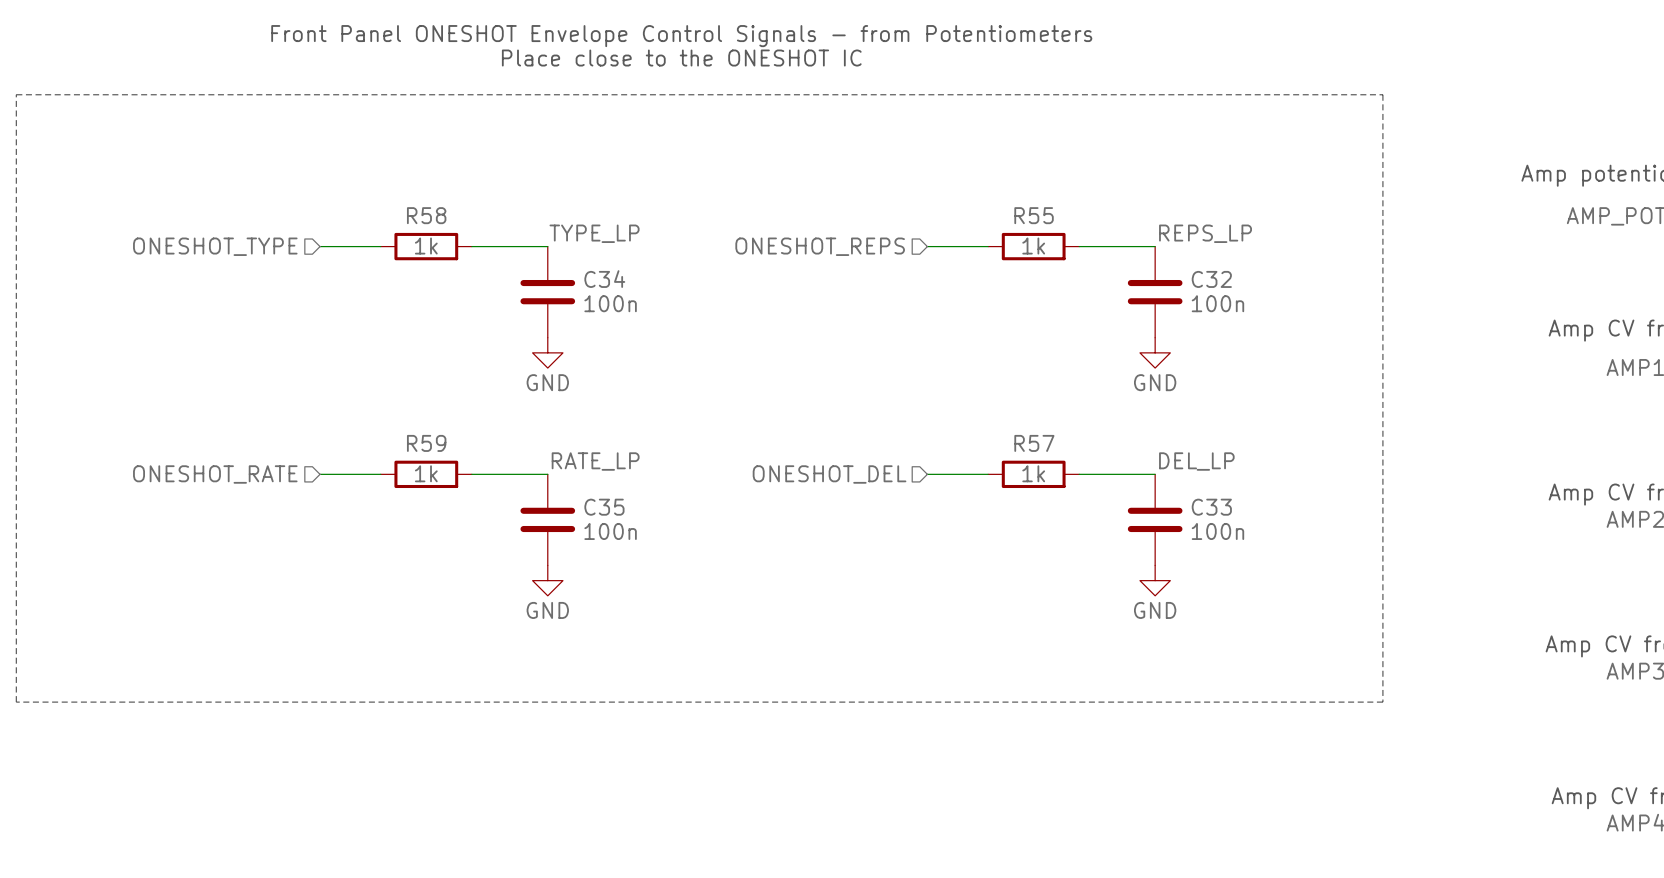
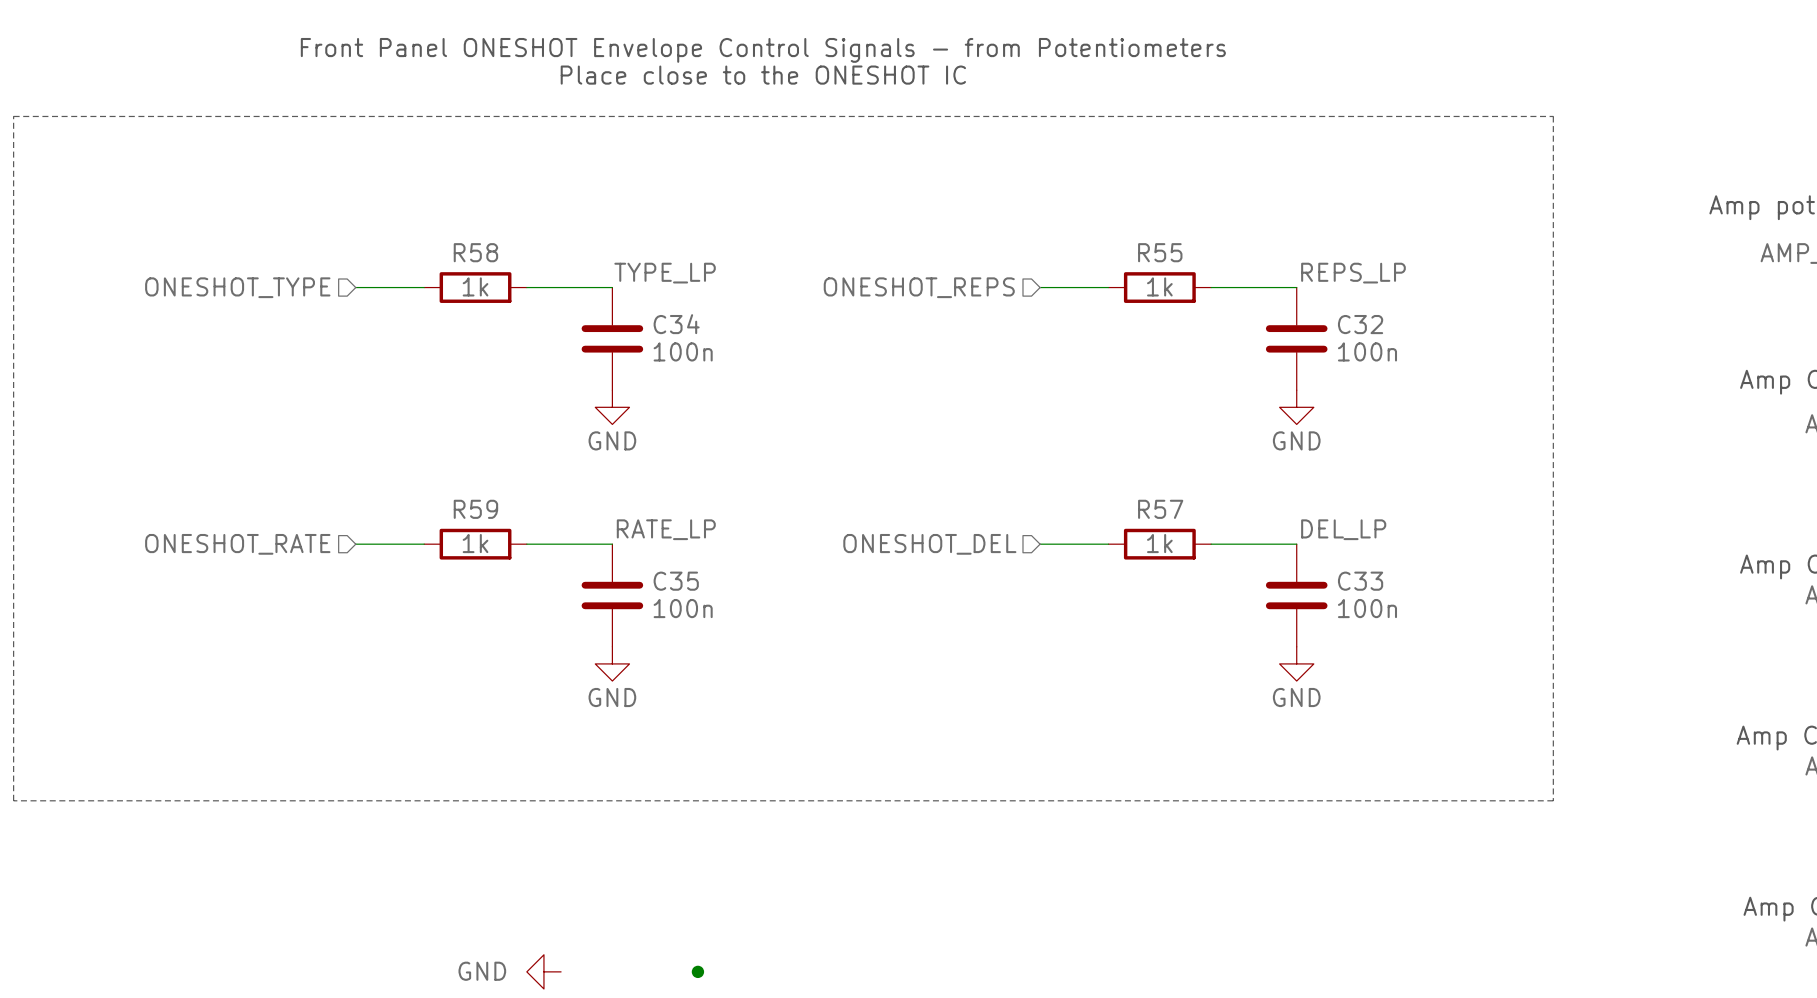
power symbol: none -> GND (543, 971)
junction: none -> (697, 971)

